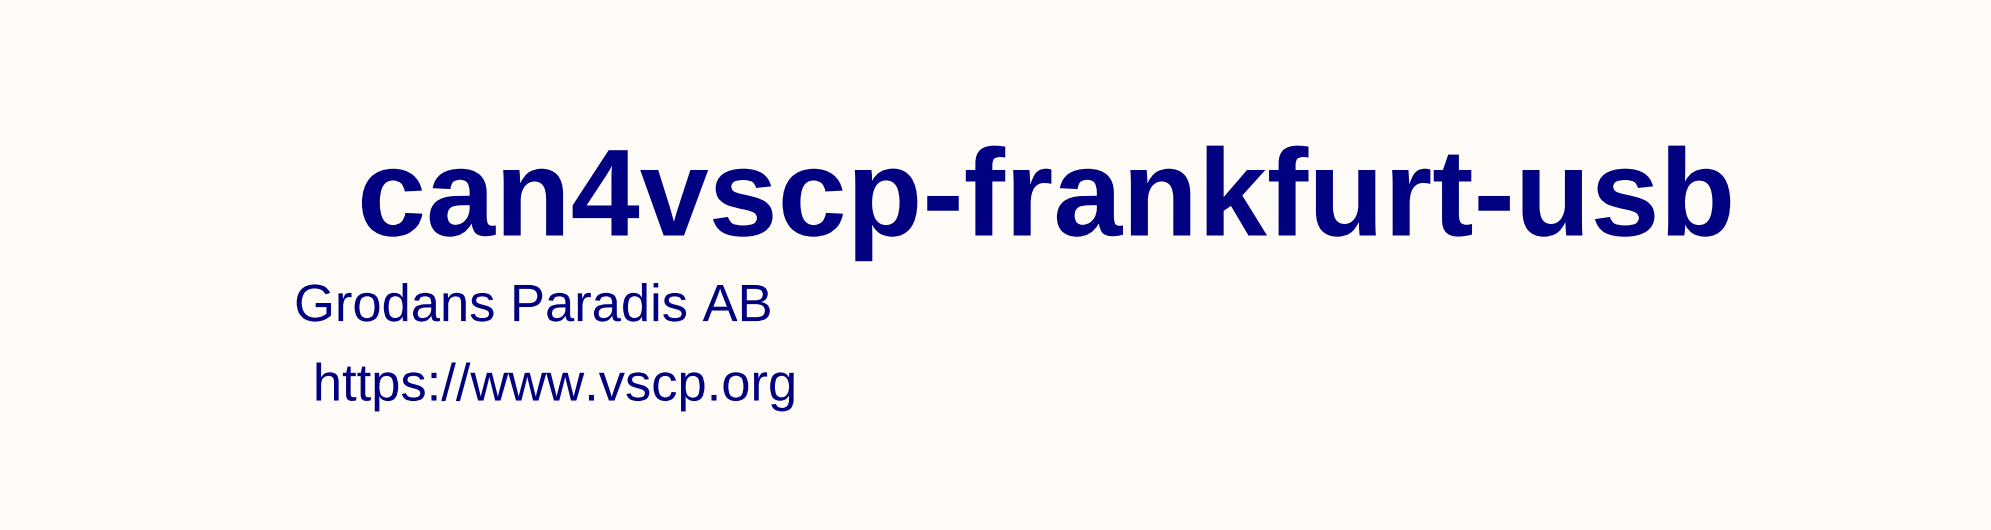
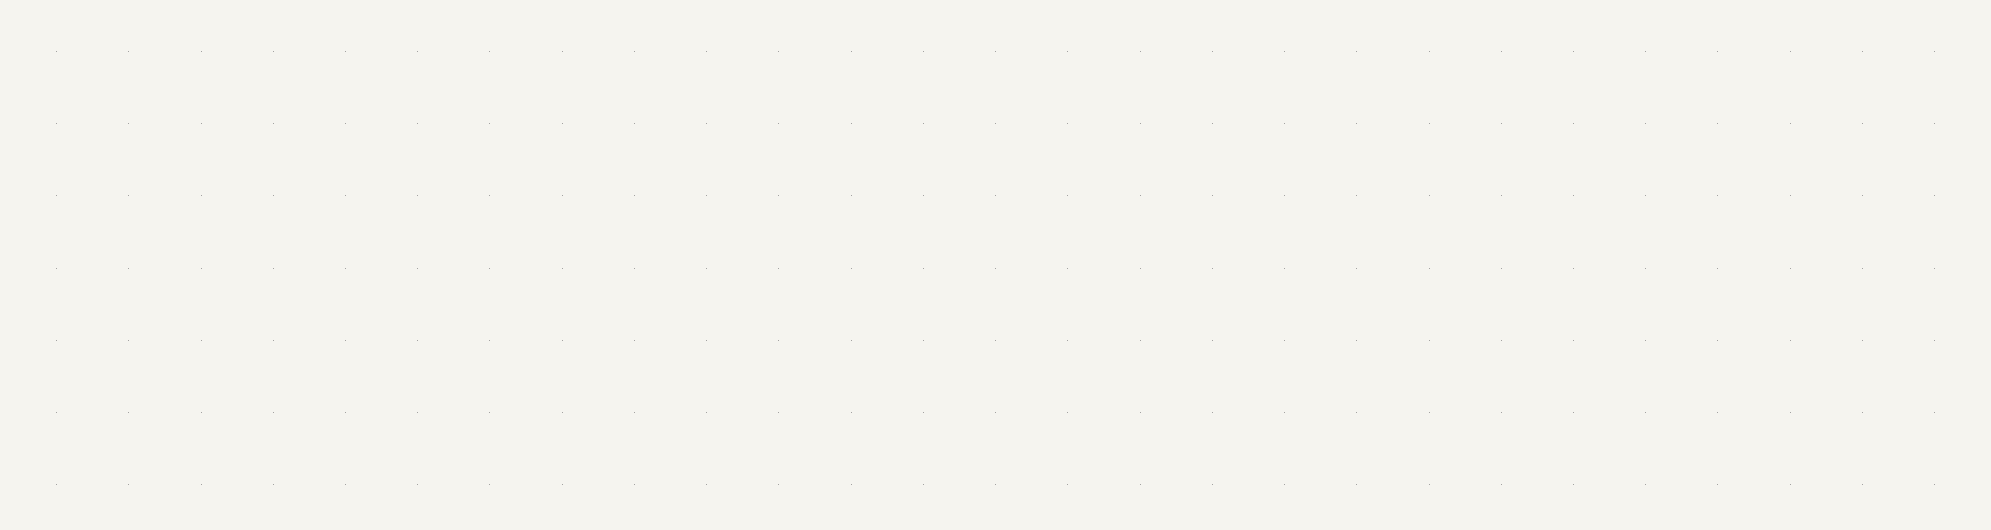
text: can4vscp-frankfurt-usb (1046, 203) -> none
text: Grodans Paradis AB (533, 302) -> none
text: https://www.vscp.org (555, 386) -> none

